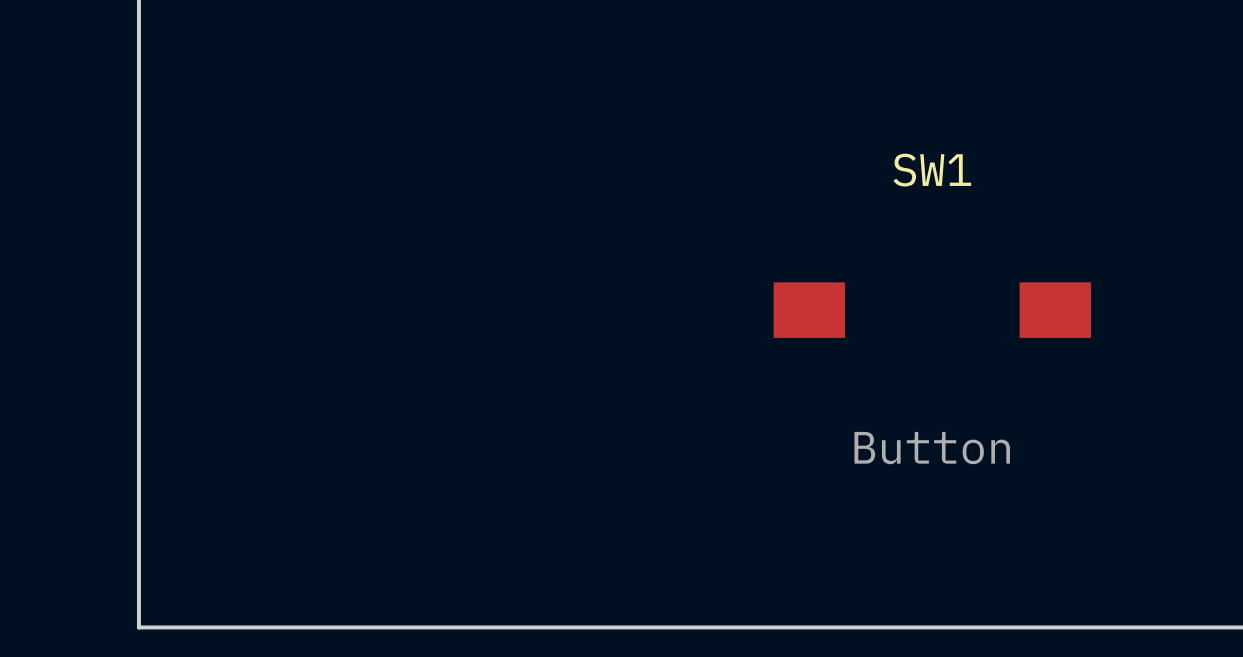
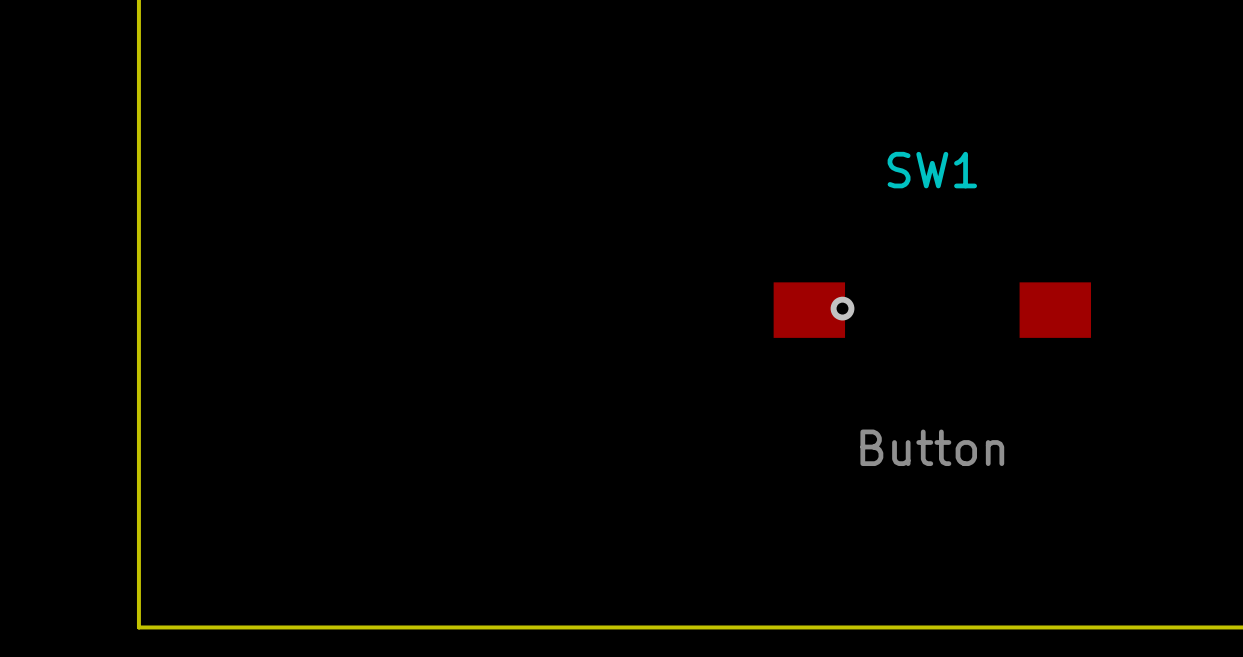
via: none -> (842, 308)

